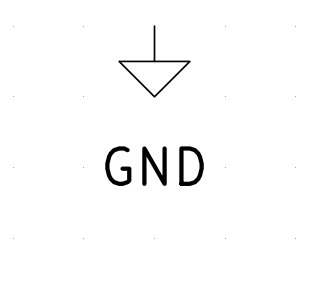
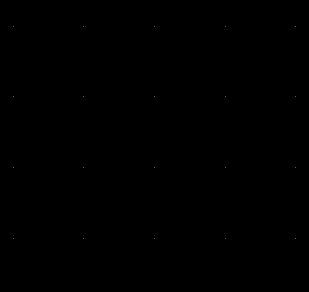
power symbol: GND (154, 61) -> none

